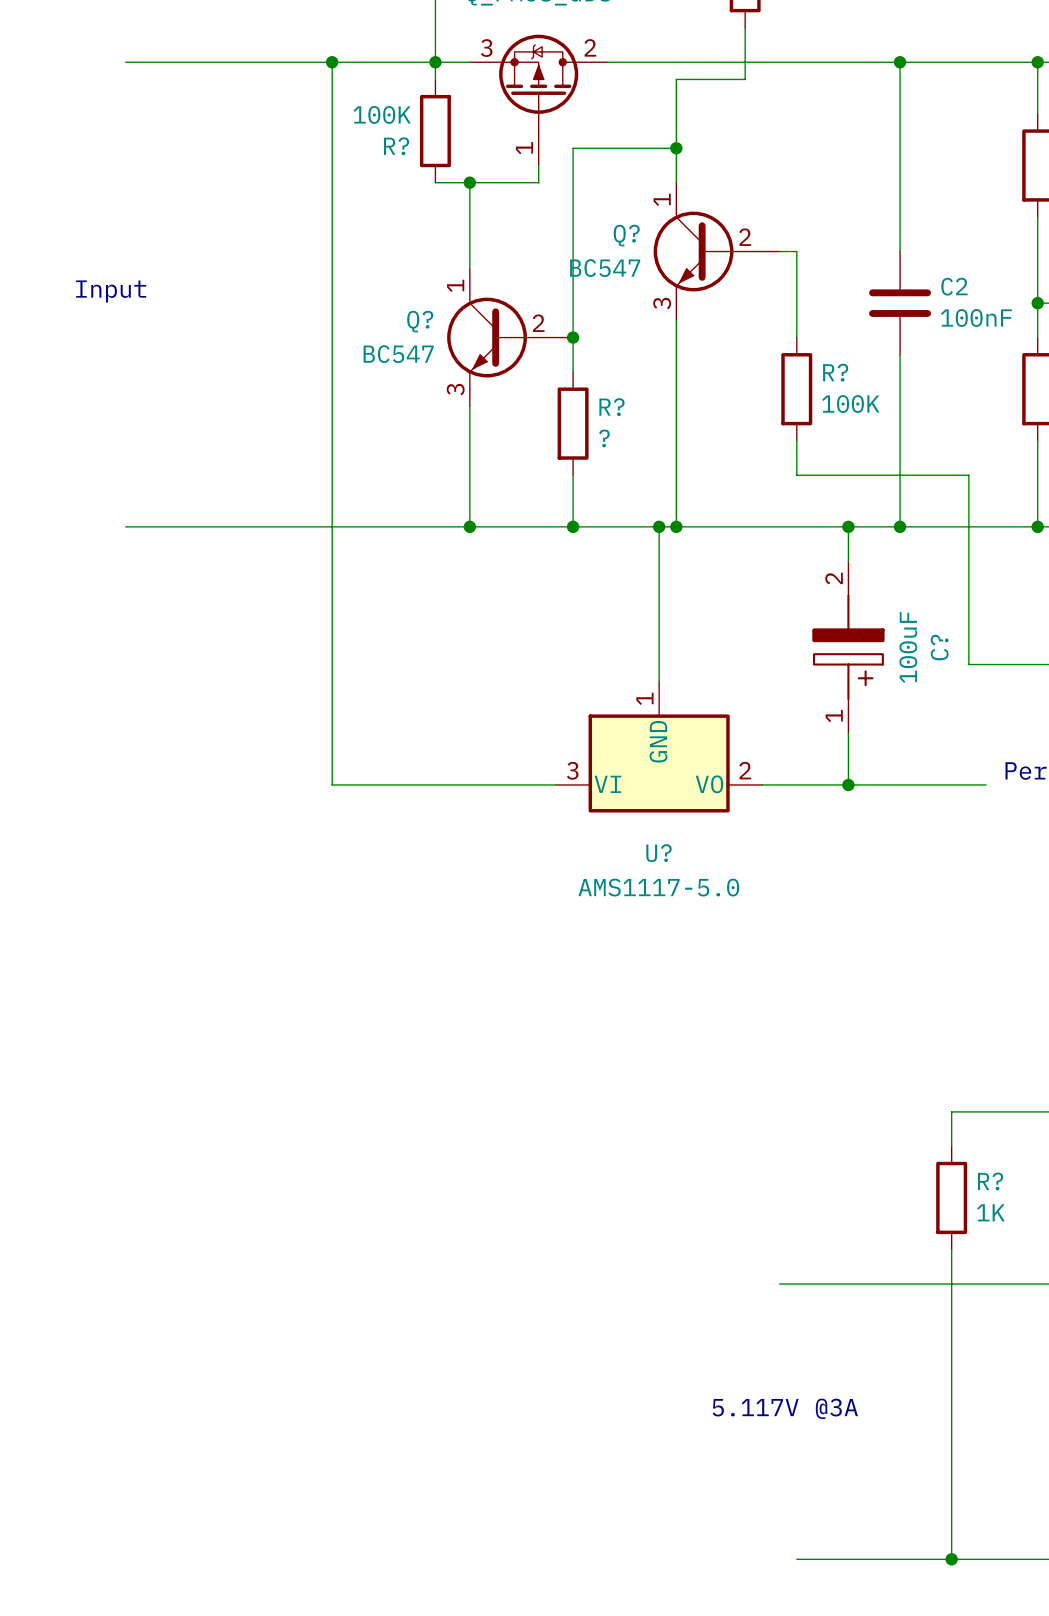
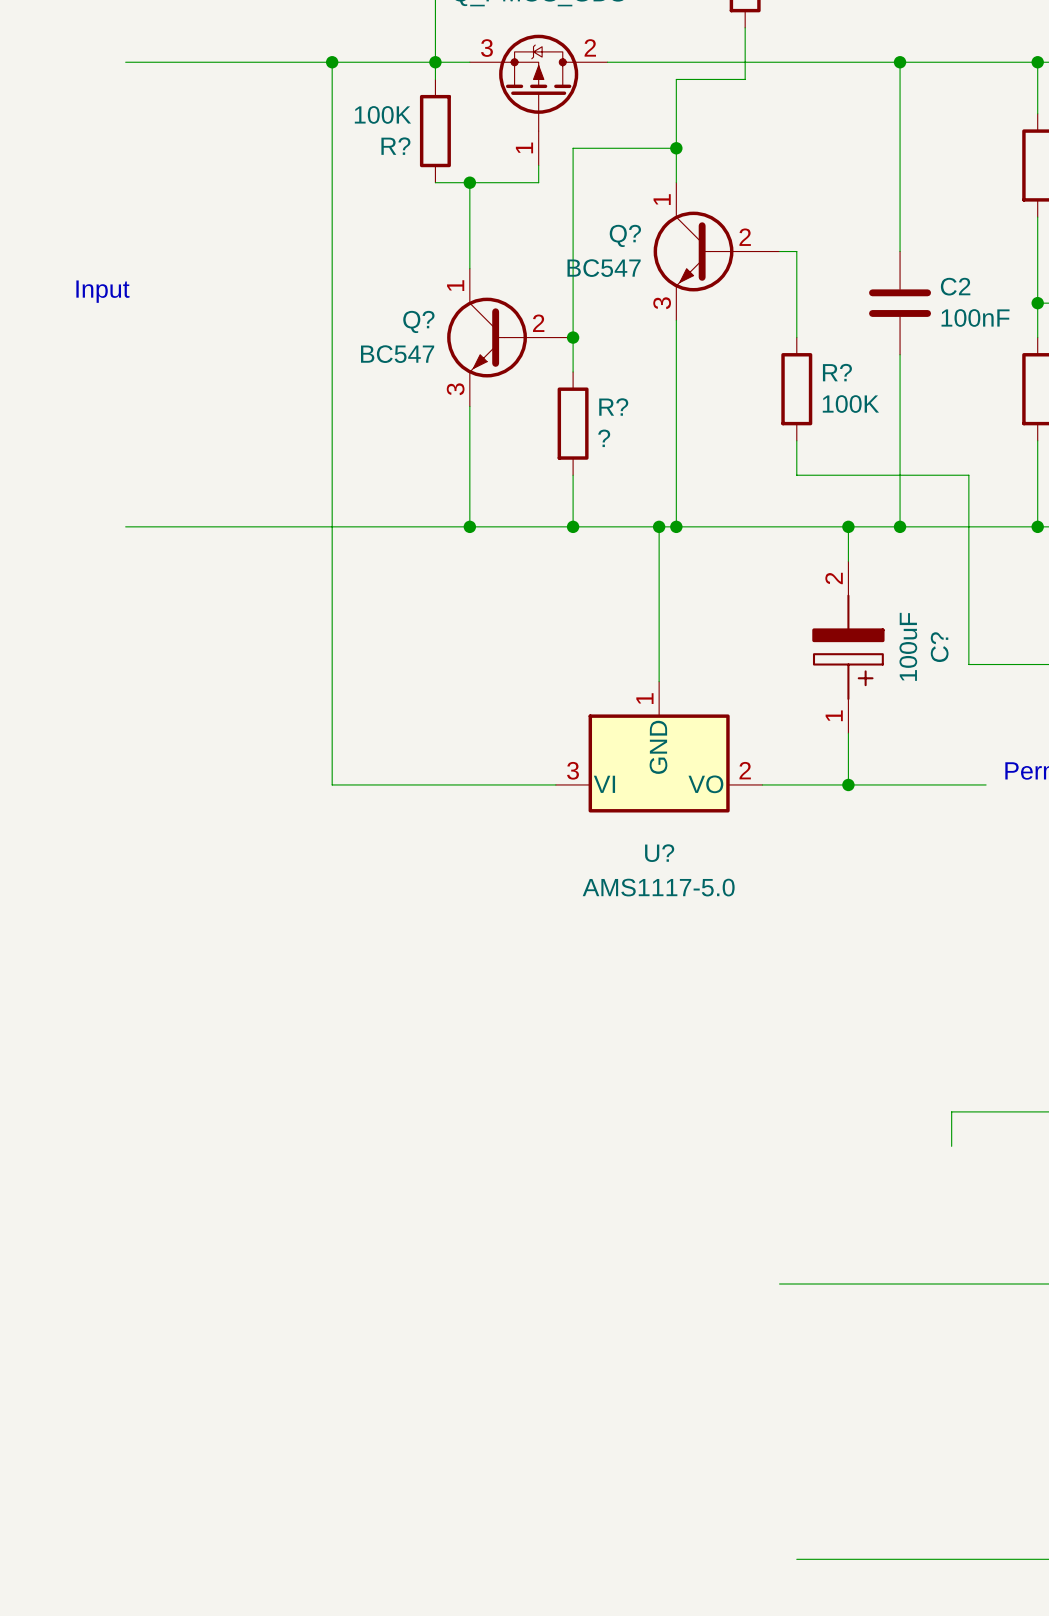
R?: 1K (951, 1197) -> none
wire: (951, 1249) (951, 1559) -> none
text: 5.117V @3A (785, 1408) -> none
junction: (951, 1559) -> none

